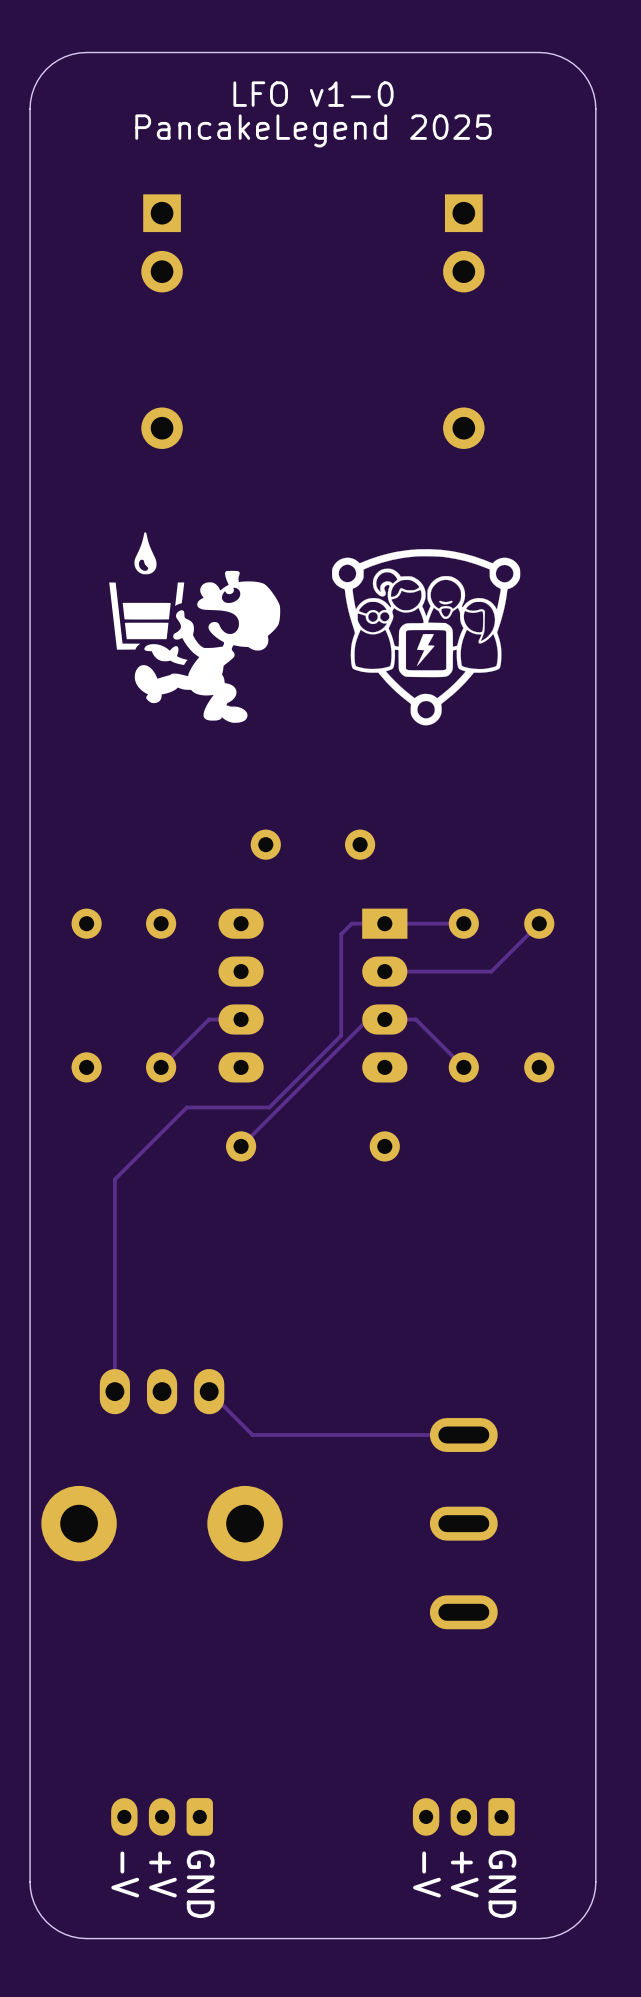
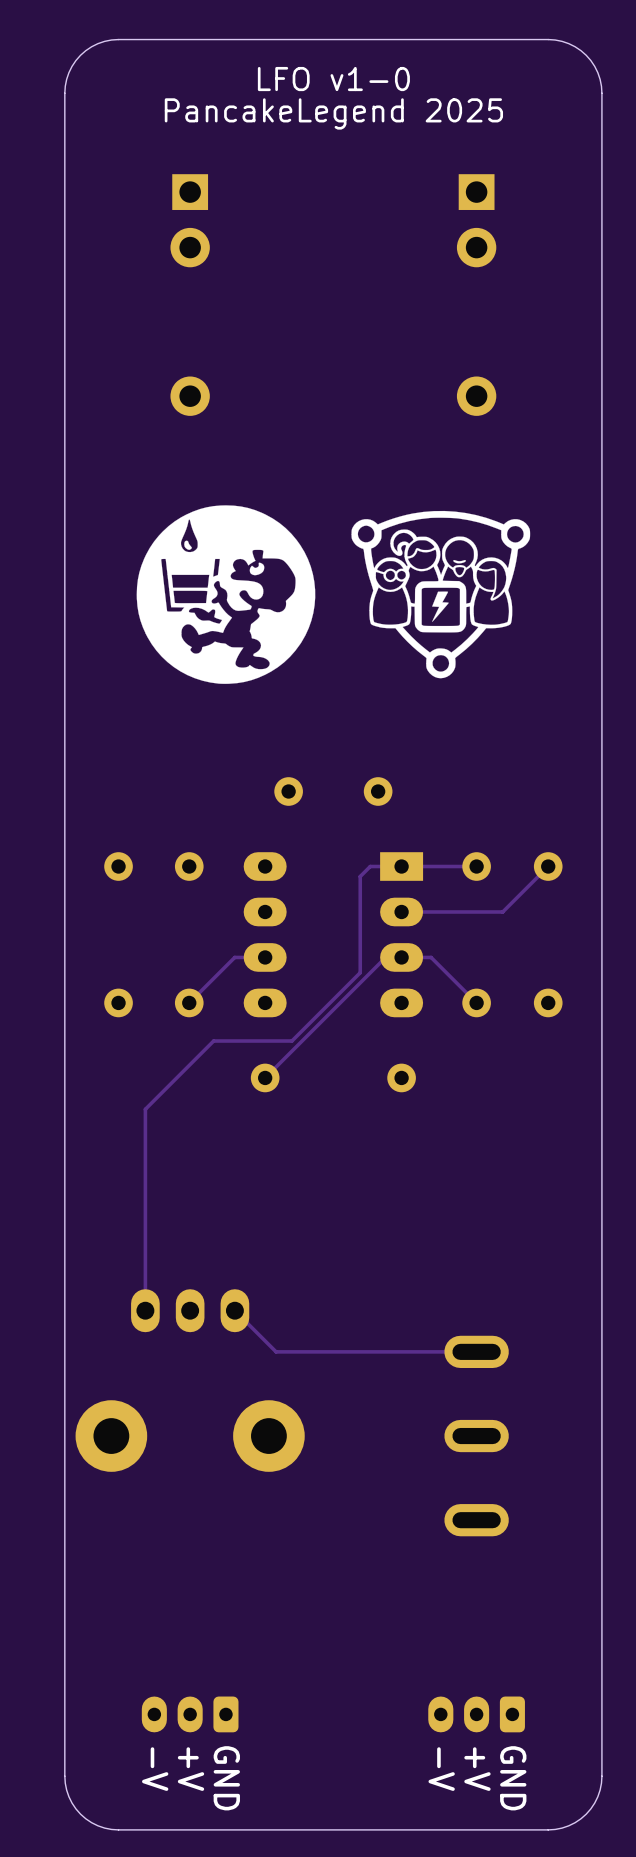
drawing shape: [109, 532, 281, 723] -> [136, 505, 316, 684]

